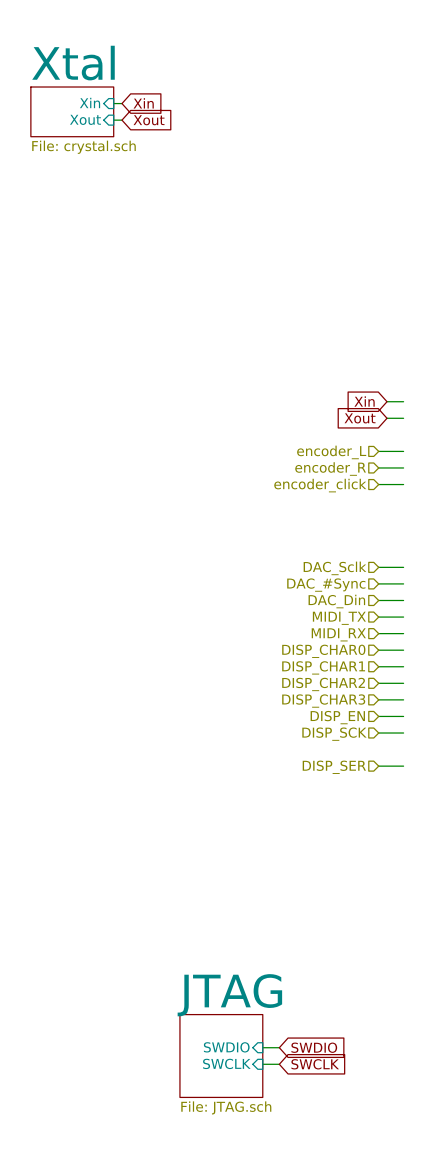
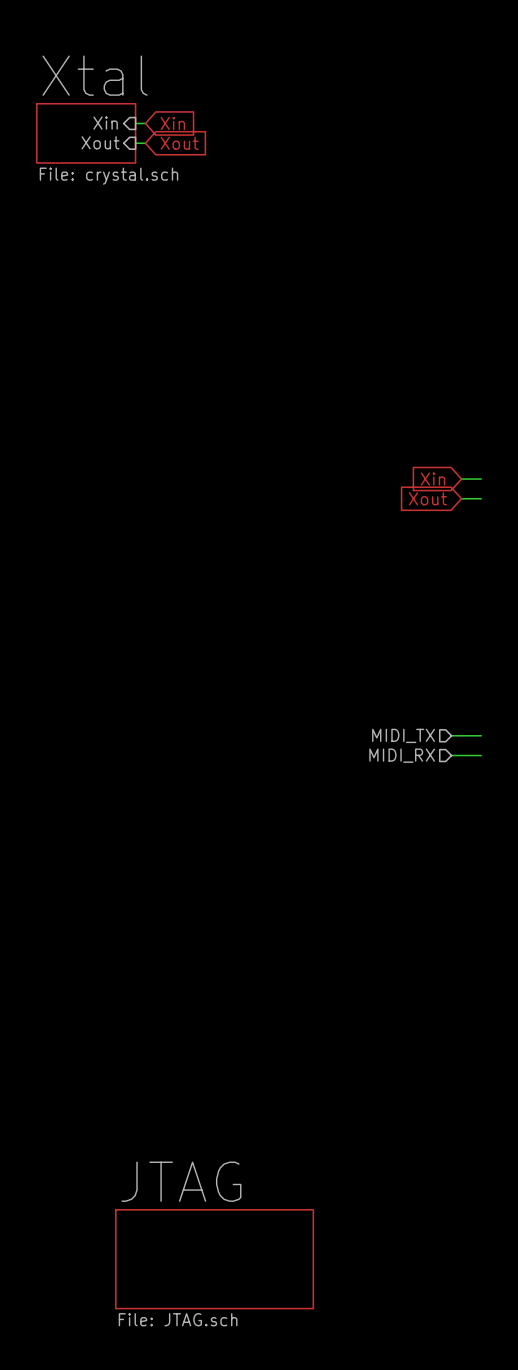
wire: (378, 451) (403, 451) -> none
hierarchical label: encoder_L (331, 452) -> none
wire: (378, 467) (403, 467) -> none
hierarchical label: encoder_R (330, 469) -> none
wire: (378, 484) (403, 484) -> none
hierarchical label: encoder_click (320, 485) -> none
wire: (378, 567) (403, 567) -> none
hierarchical label: DAC_Sclk (334, 568) -> none
wire: (378, 583) (403, 583) -> none
hierarchical label: DAC_#Sync (326, 585) -> none
wire: (378, 600) (403, 600) -> none
hierarchical label: DAC_Din (336, 601) -> none
wire: (378, 650) (403, 650) -> none
hierarchical label: DISP_CHAR0 (323, 651) -> none
wire: (378, 666) (403, 666) -> none
hierarchical label: DISP_CHAR1 (323, 667) -> none
wire: (378, 683) (403, 683) -> none
hierarchical label: DISP_CHAR2 (323, 684) -> none
wire: (378, 699) (403, 699) -> none
hierarchical label: DISP_CHAR3 (323, 701) -> none
wire: (378, 716) (403, 716) -> none
hierarchical label: DISP_EN (337, 717) -> none
wire: (378, 733) (403, 733) -> none
hierarchical label: DISP_SCK (334, 734) -> none
wire: (378, 766) (403, 766) -> none
hierarchical label: DISP_SER (334, 767) -> none
sheet pin: SWDIO (226, 1047) -> none
wire: (262, 1047) (279, 1047) -> none
global label: SWDIO (314, 1047) -> none
sheet JTAG: none -> File: JTAG.sch (214, 1259)
sheet JTAG: File: JTAG.sch (221, 1056) -> none
sheet pin: SWCLK (226, 1063) -> none
wire: (262, 1064) (279, 1064) -> none
global label: SWCLK (315, 1064) -> none

